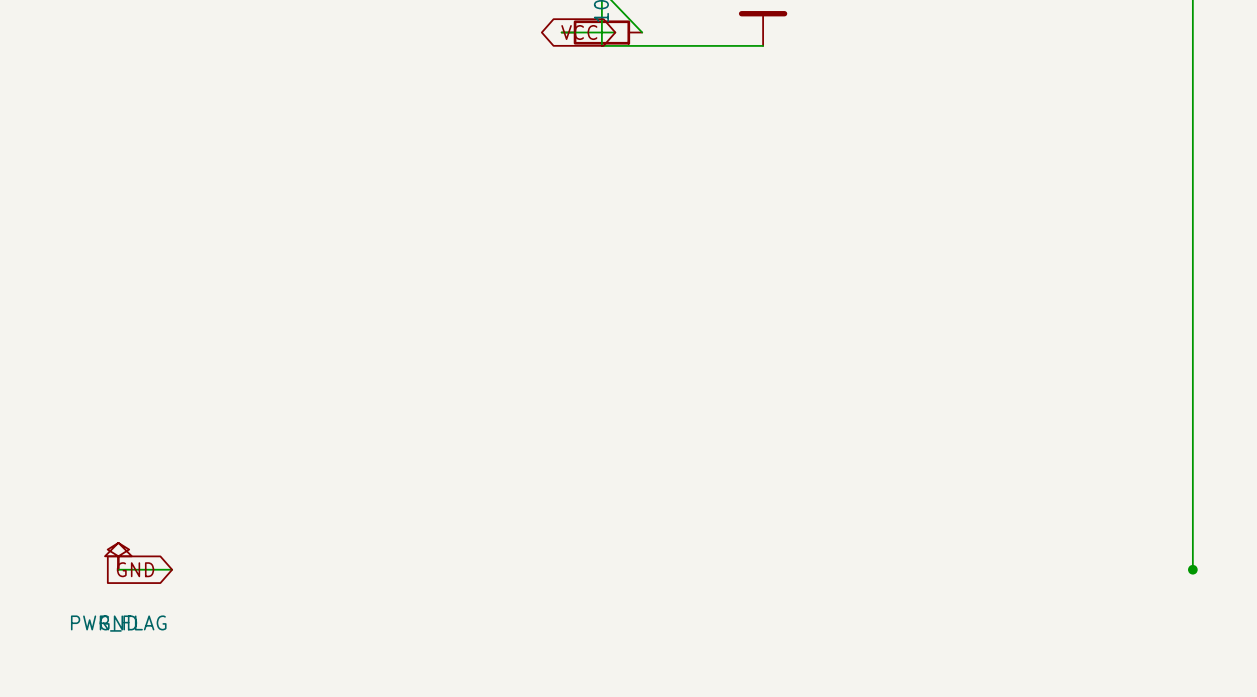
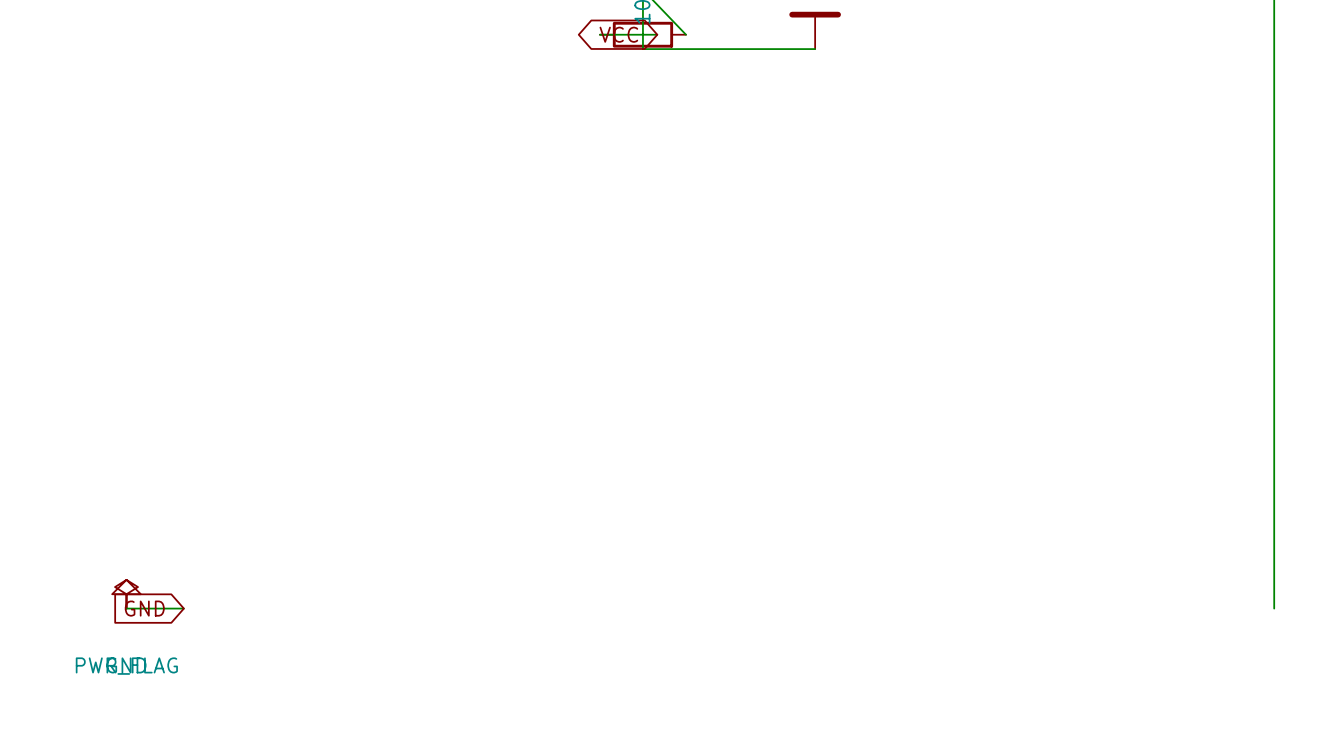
junction: (1192, 569) -> none

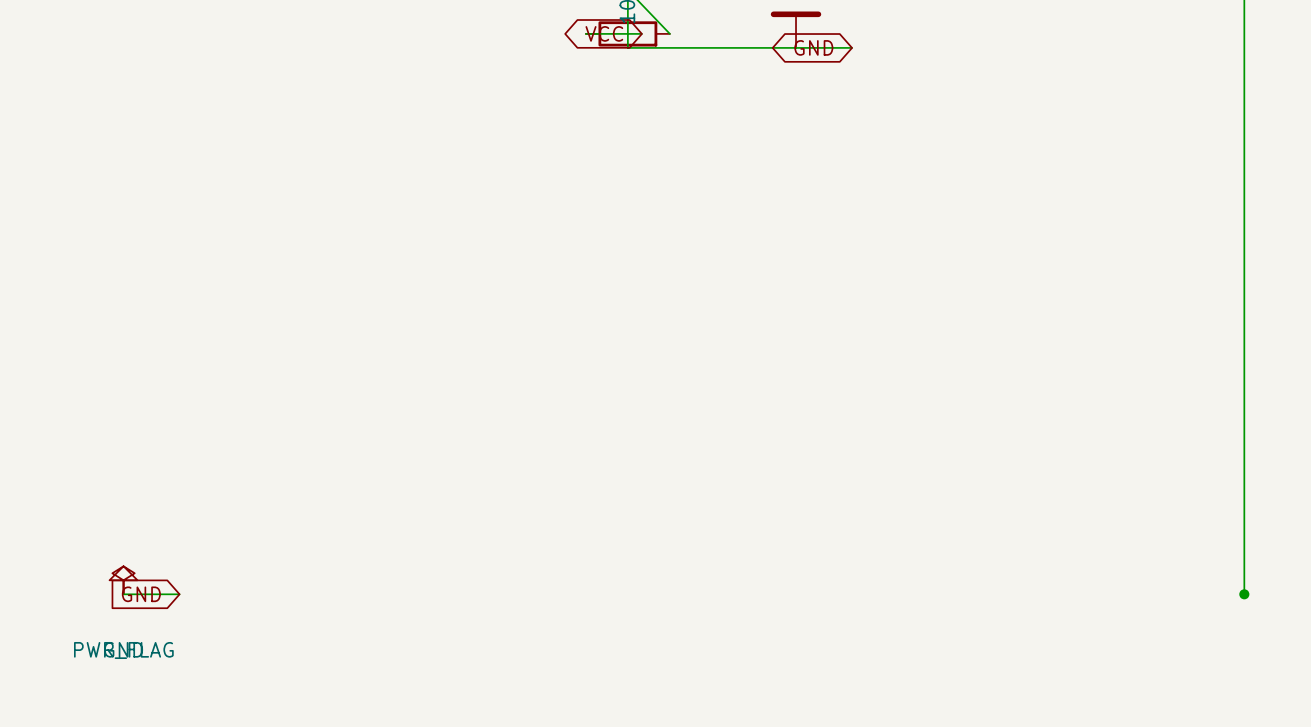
wire: none -> (796, 47) (852, 47)
global label: none -> GND (813, 47)
junction: none -> (1244, 594)

